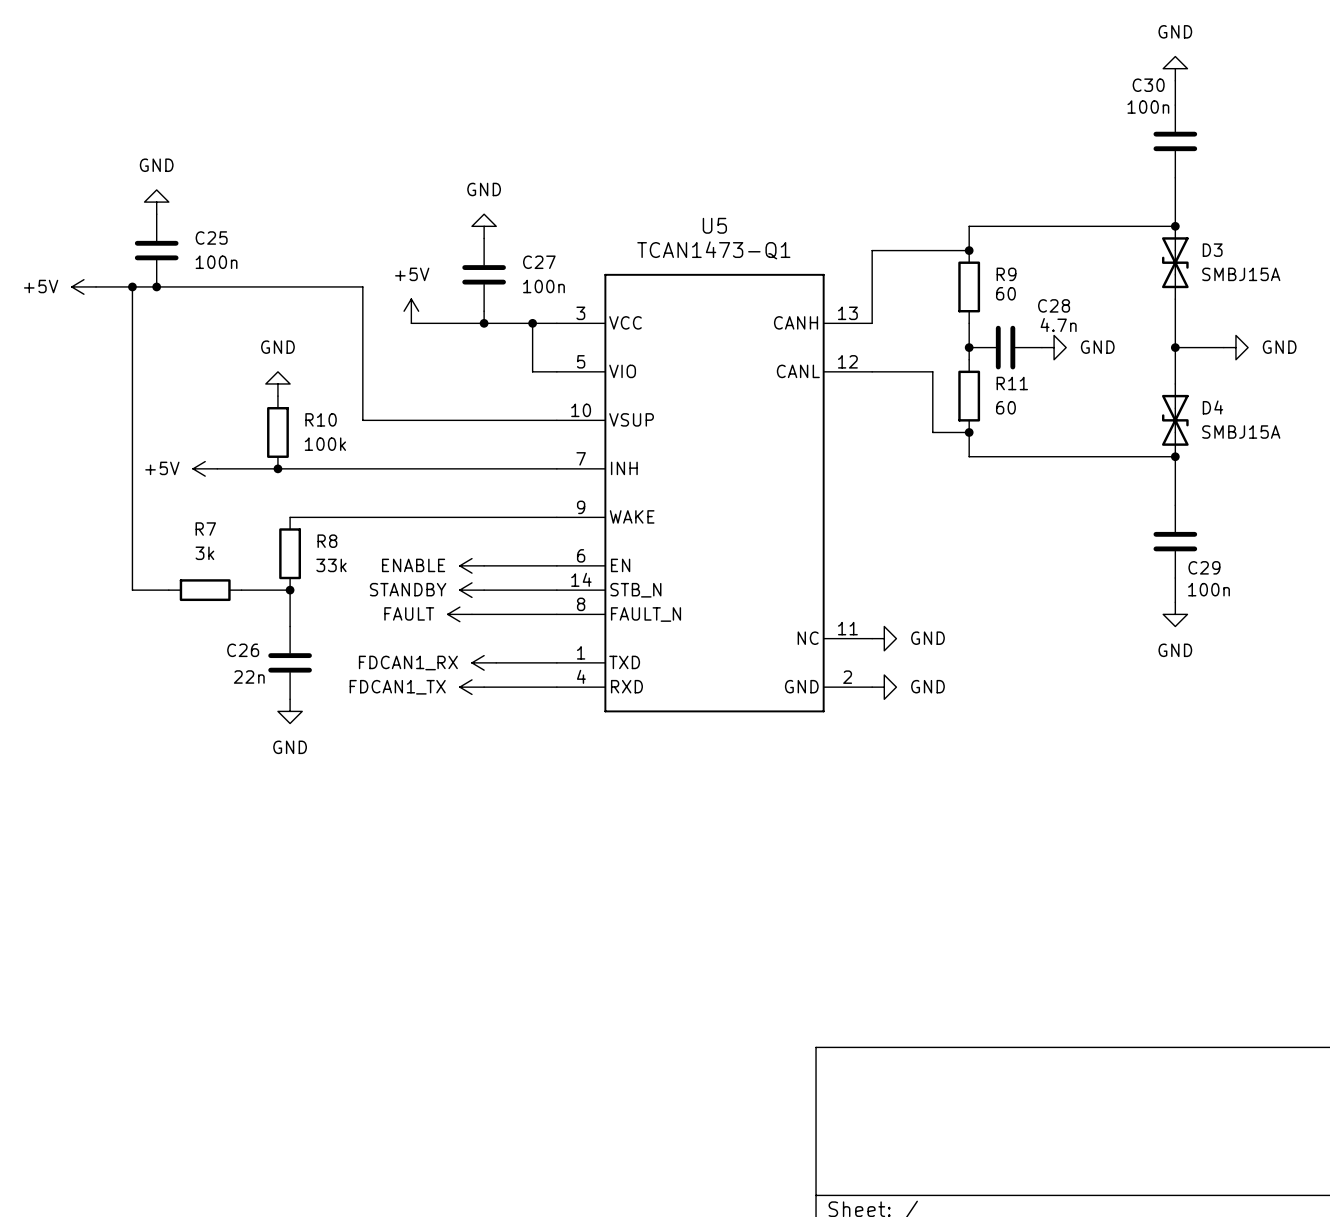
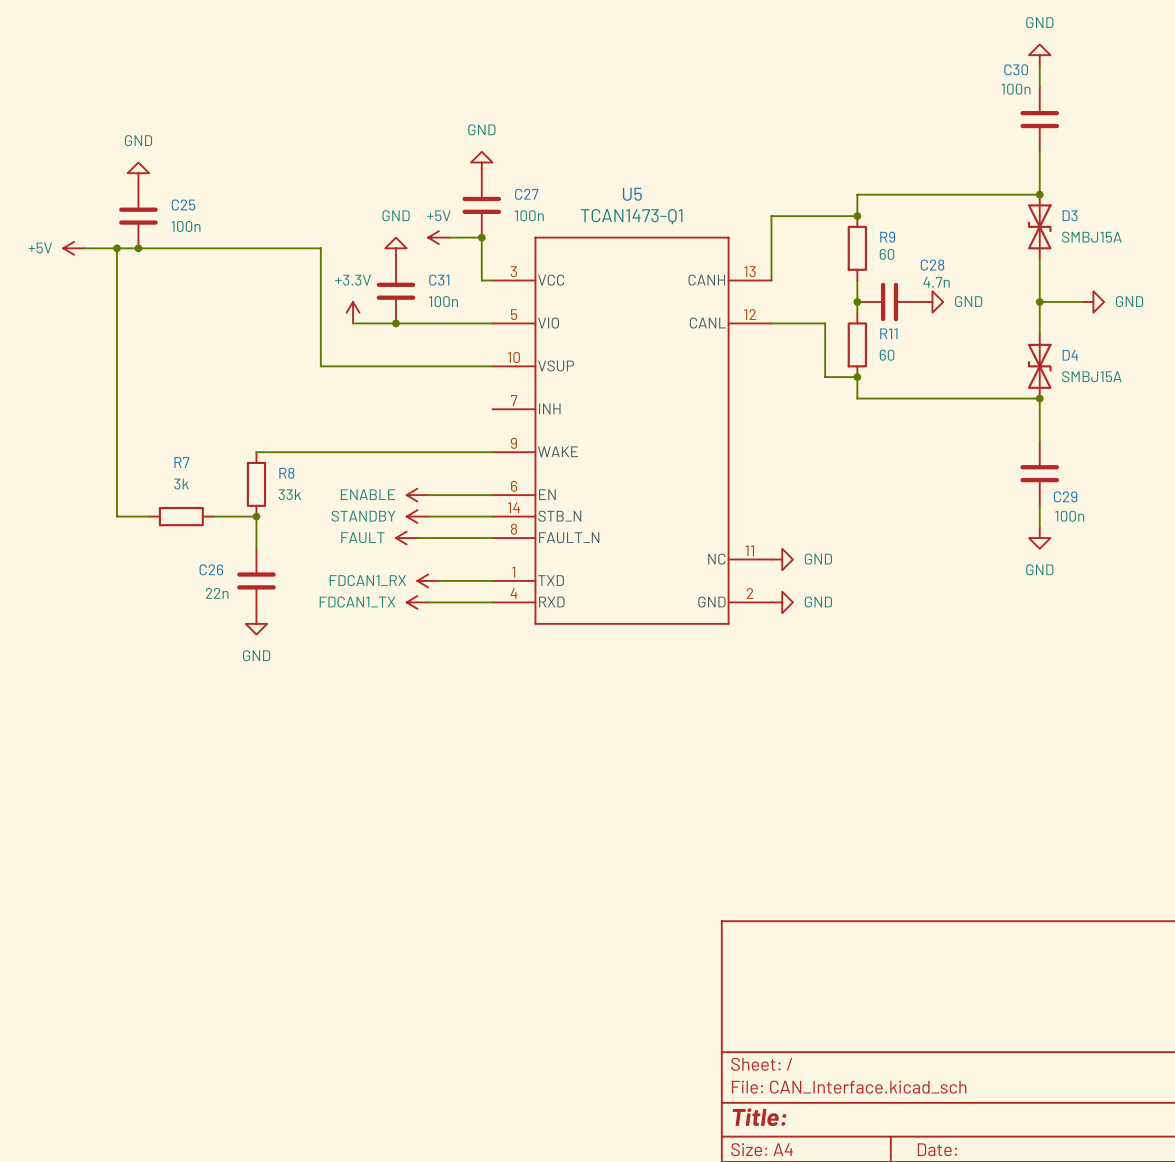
power symbol: none -> GND (481, 162)
power symbol: GND (484, 226) -> none
C27 position: (484, 274) -> (481, 205)
junction: none -> (481, 237)
power symbol: none -> GND (395, 248)
power symbol rotation: 0° (411, 311) -> 90° counterclockwise (438, 237)
power symbol position: +5V (411, 311) -> +5V (438, 237)
wire: (484, 311) (484, 323) -> none
wire: (411, 323) (544, 323) -> (449, 237) (481, 237) (481, 280)
junction: (484, 323) -> none
wire: (532, 323) (532, 371) -> (353, 323) (471, 323)
junction: (532, 323) -> none
C31: none -> 100n (395, 291)
power symbol: none -> +3.3V (353, 312)
junction: none -> (395, 323)
power symbol: GND (277, 383) -> none
R10: 100k (277, 432) -> none
power symbol: +5V (205, 468) -> none
wire: (217, 468) (556, 468) -> none
junction: (277, 468) -> none

